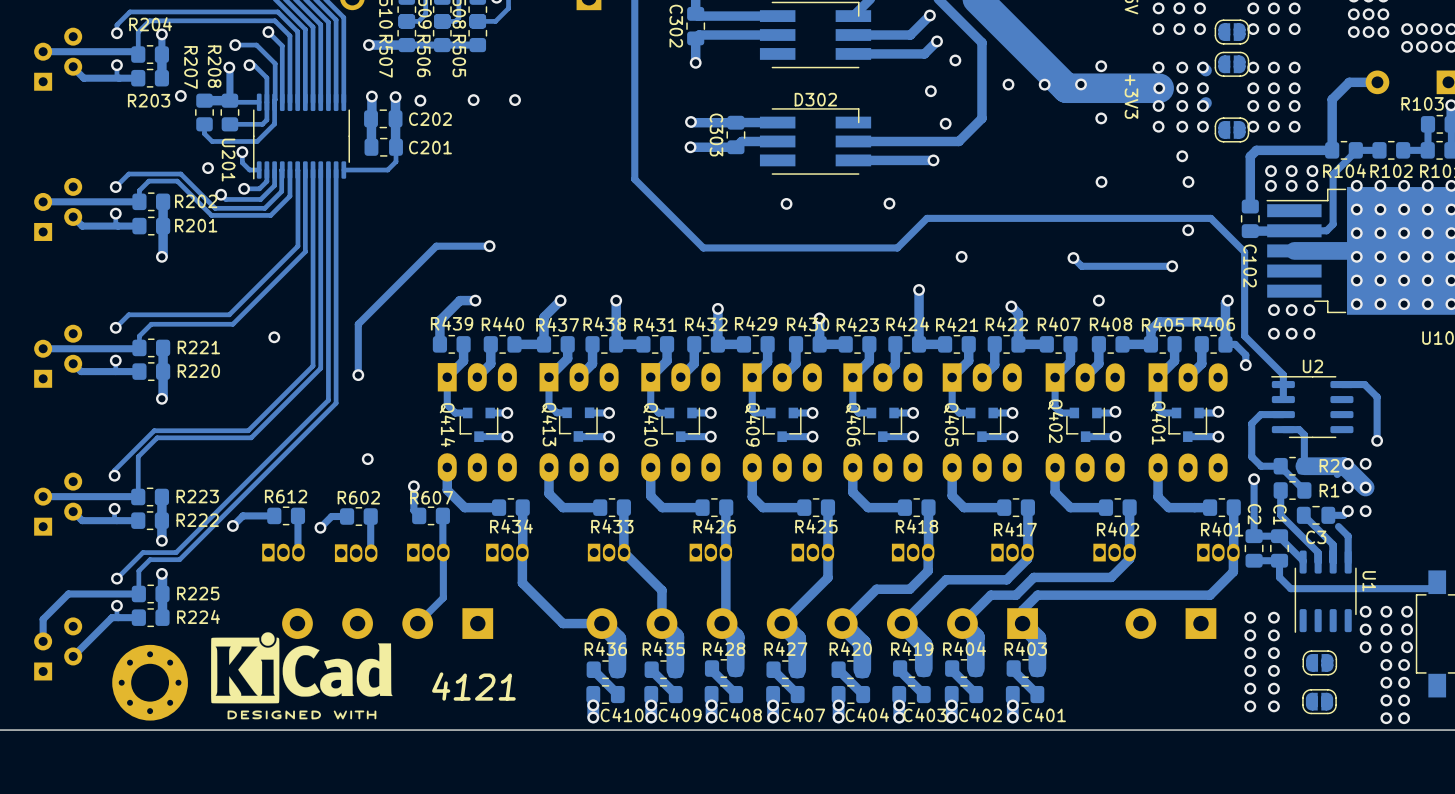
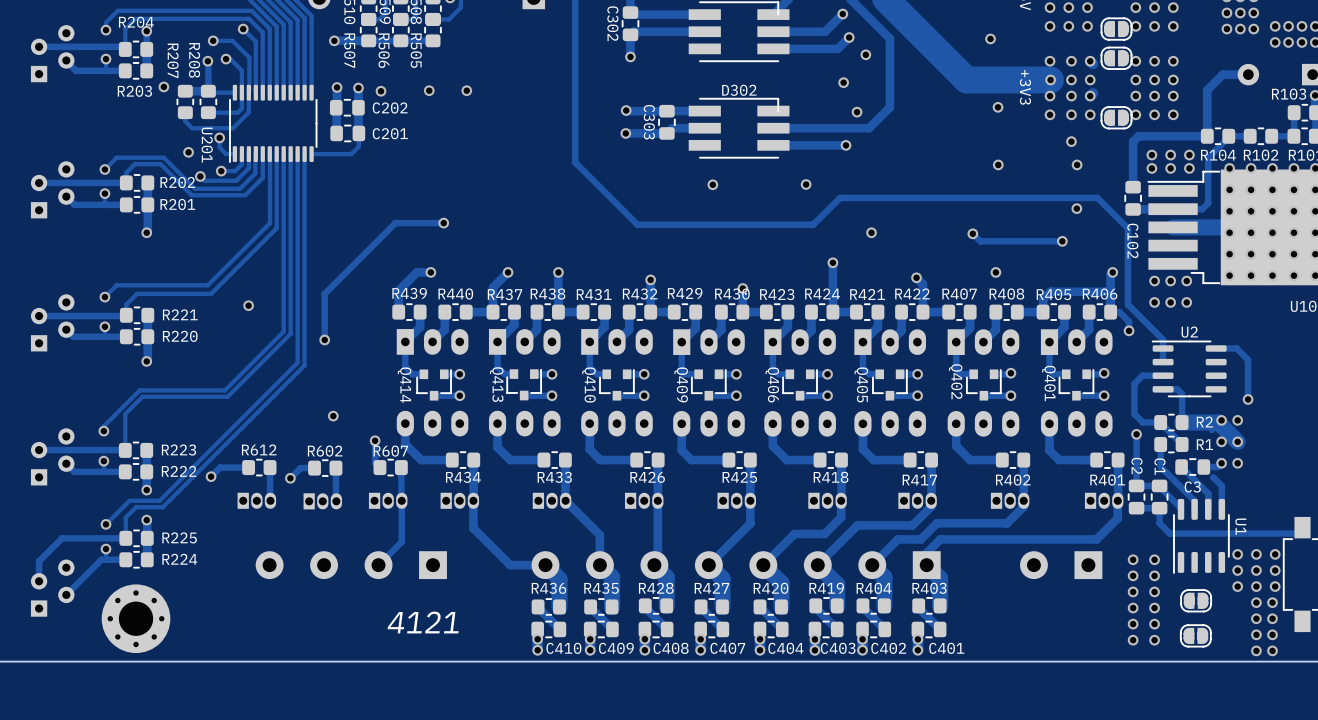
via: none -> (990, 38)
via: (1101, 66) -> none
via: (1008, 84) -> none
via: (1044, 84) -> none
via: (1081, 84) -> none
drawing: [211, 632, 393, 720] -> none

